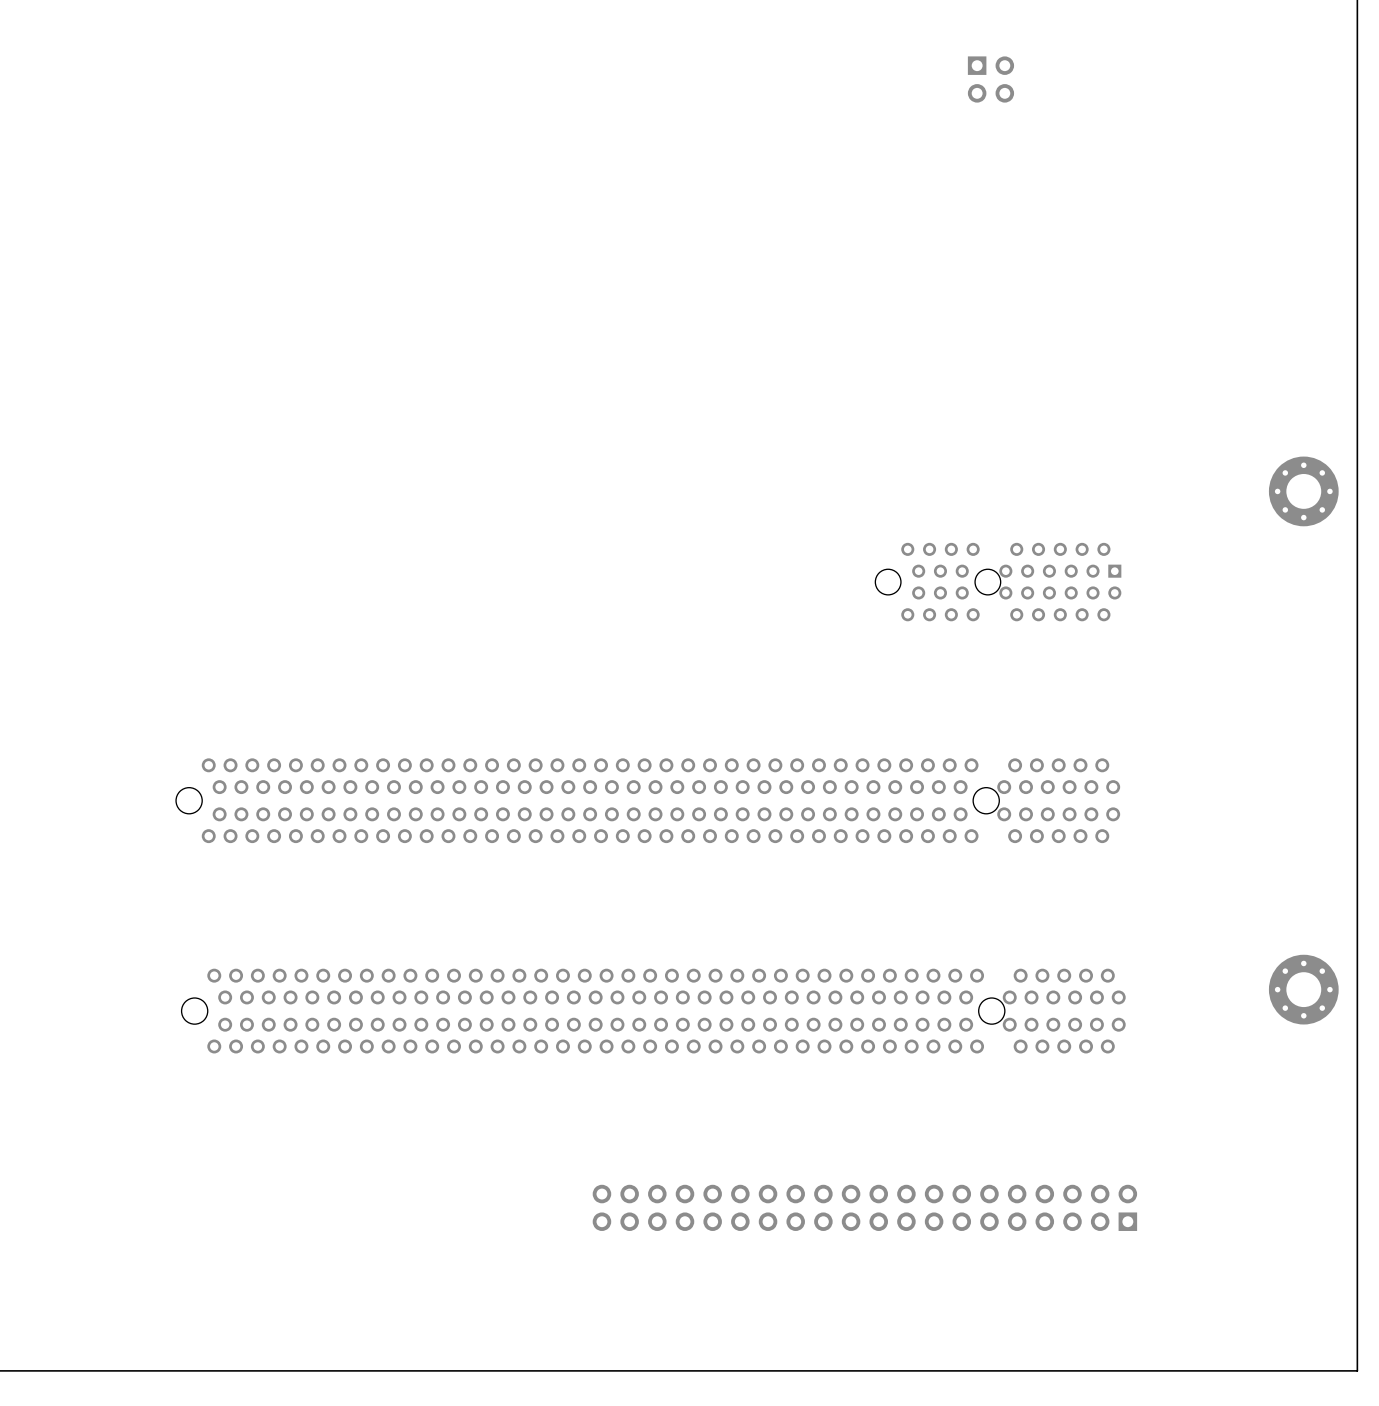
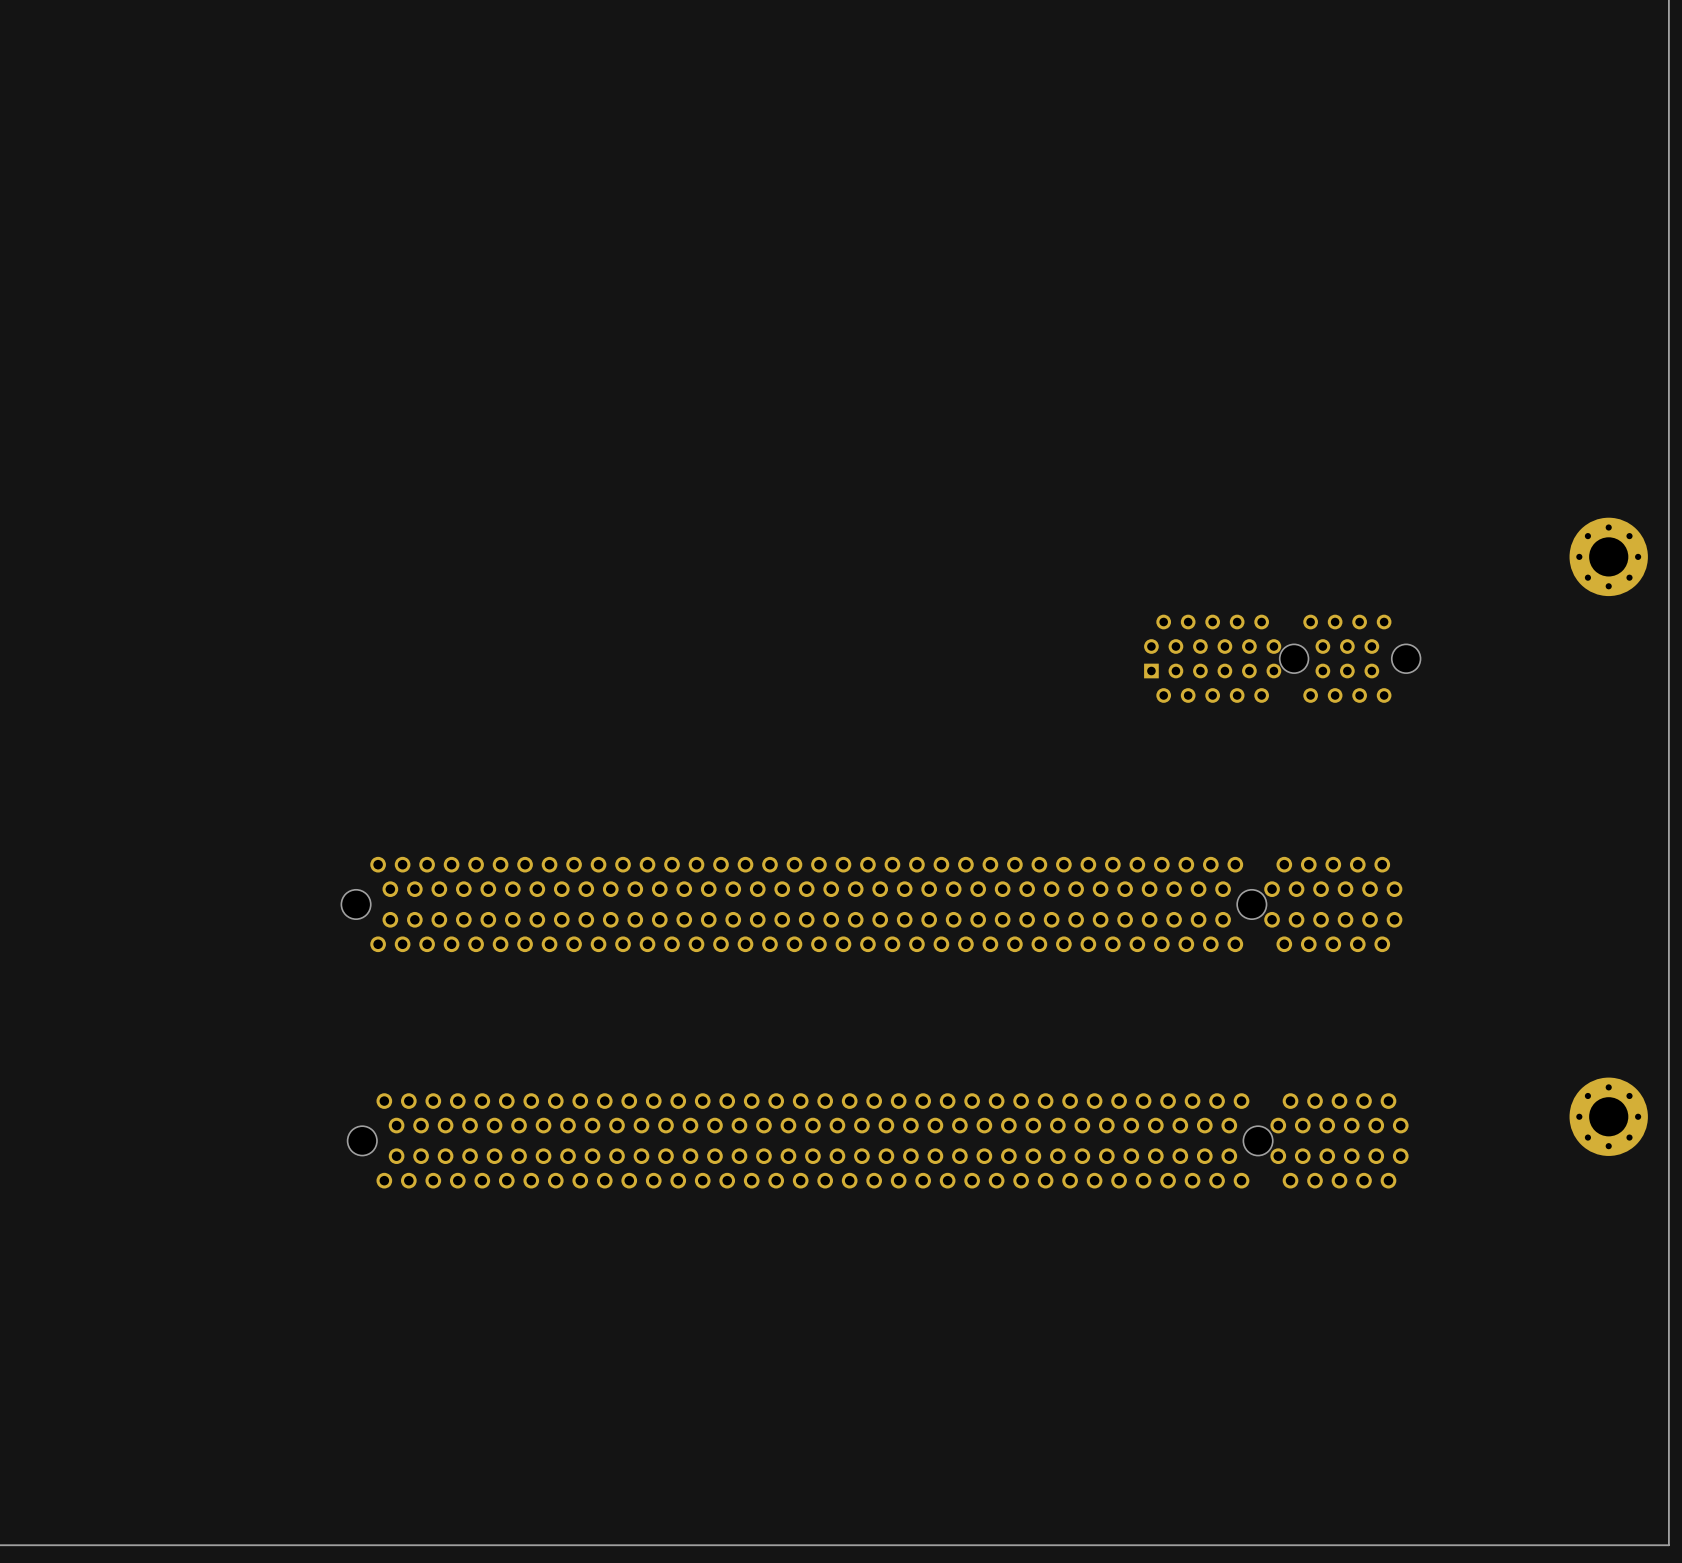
part: (990, 79) -> none
part rotation: 0° (998, 582) -> 180° (1282, 658)
part: (864, 1207) -> none

